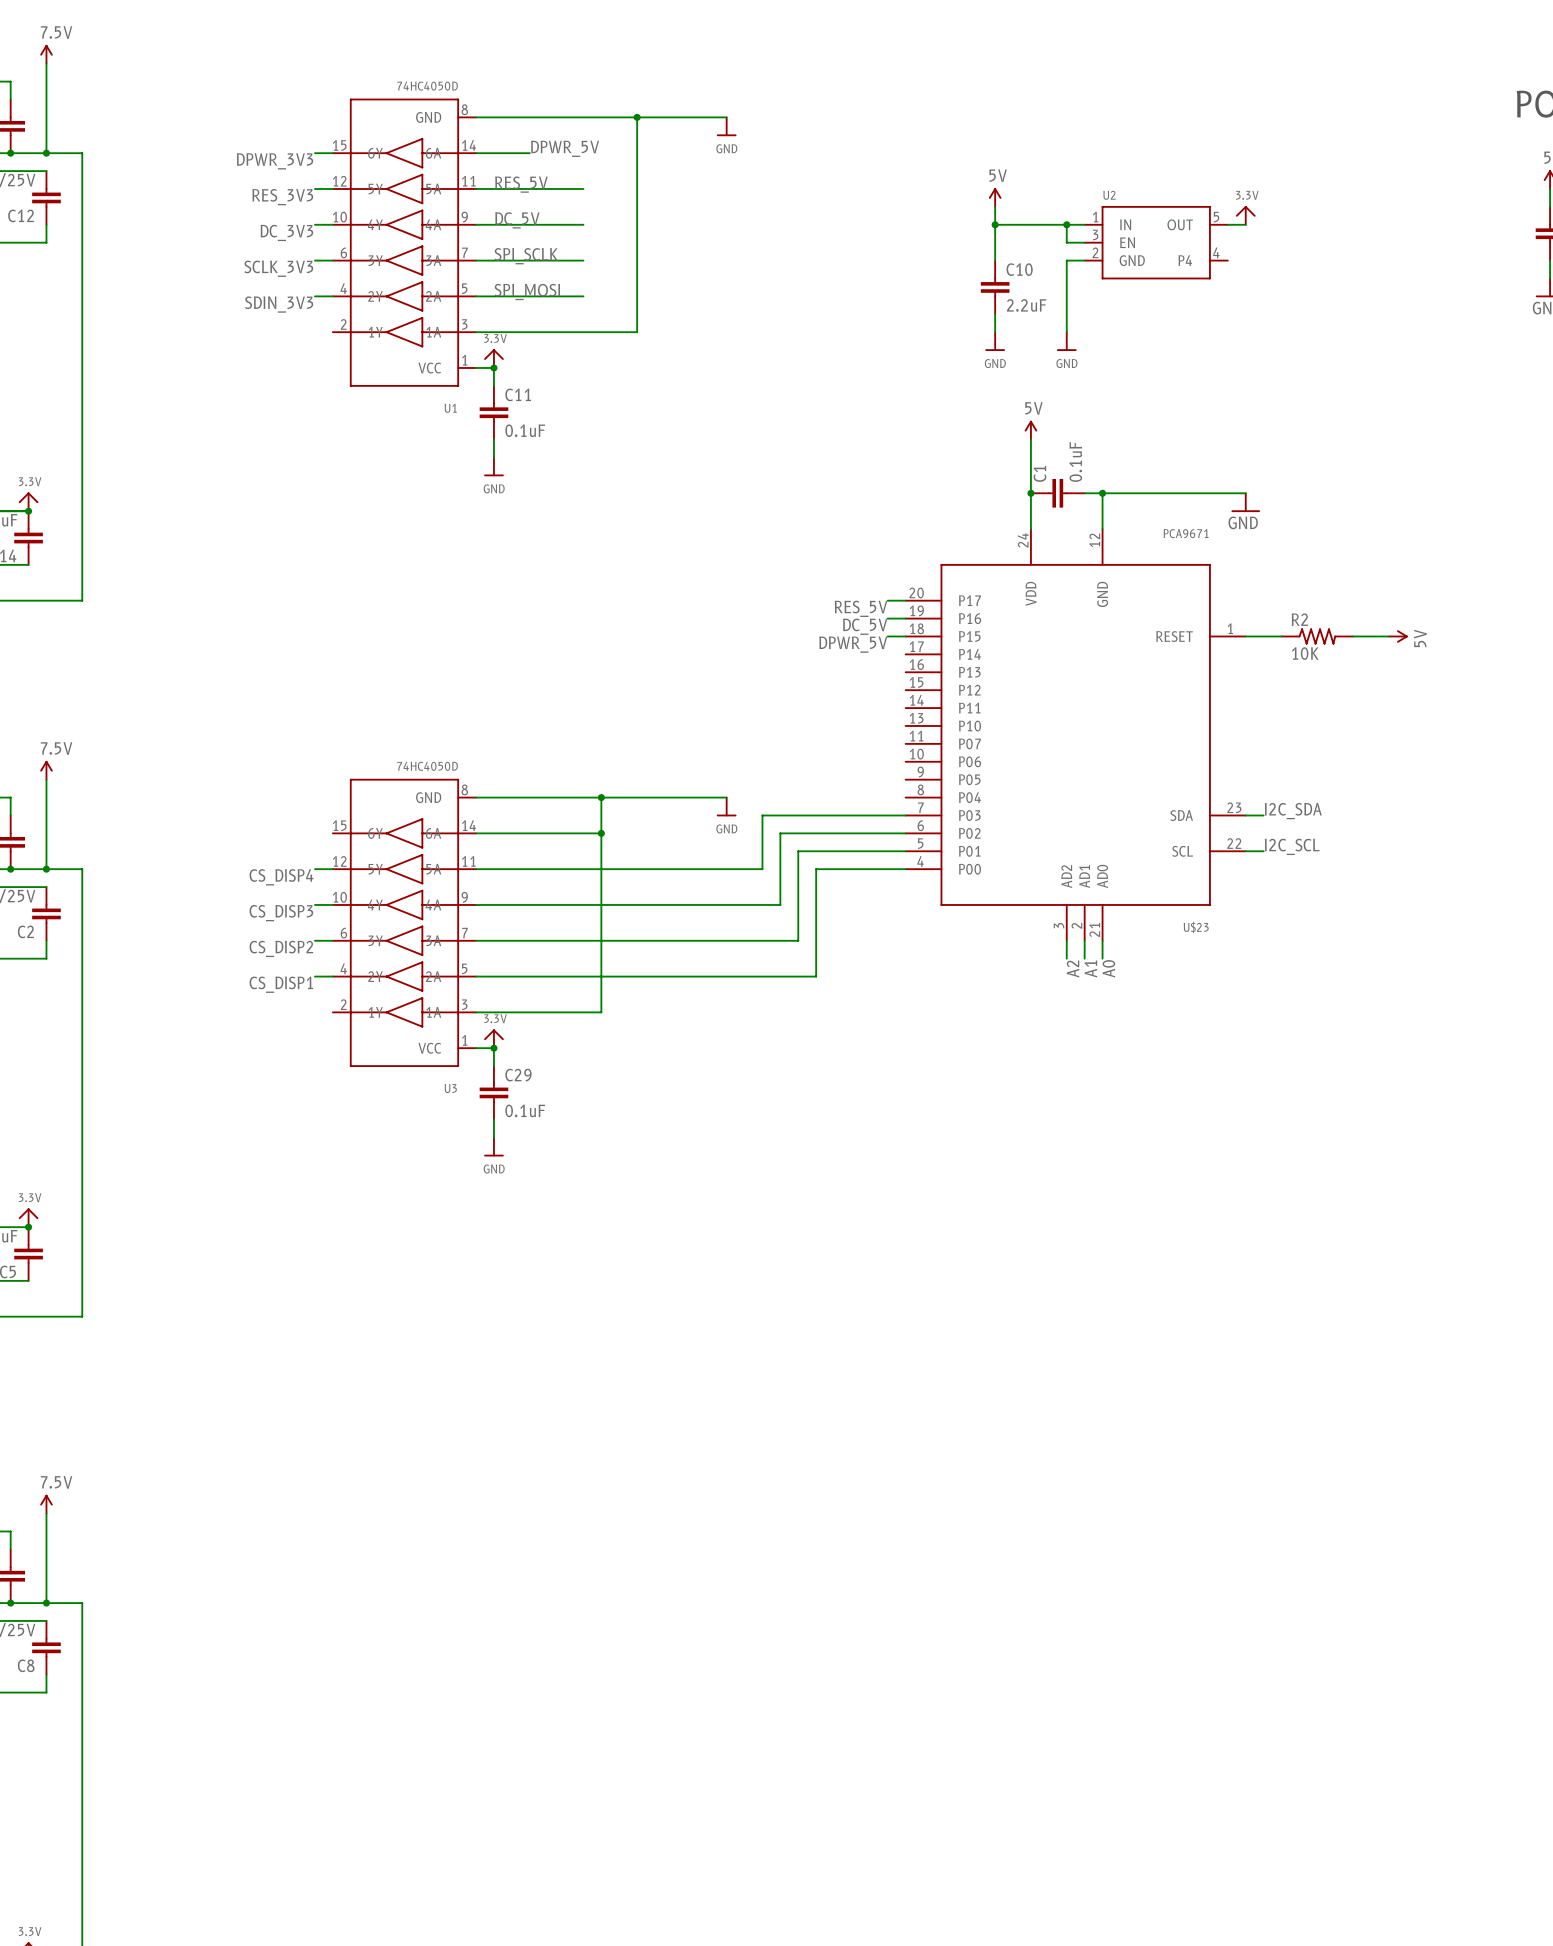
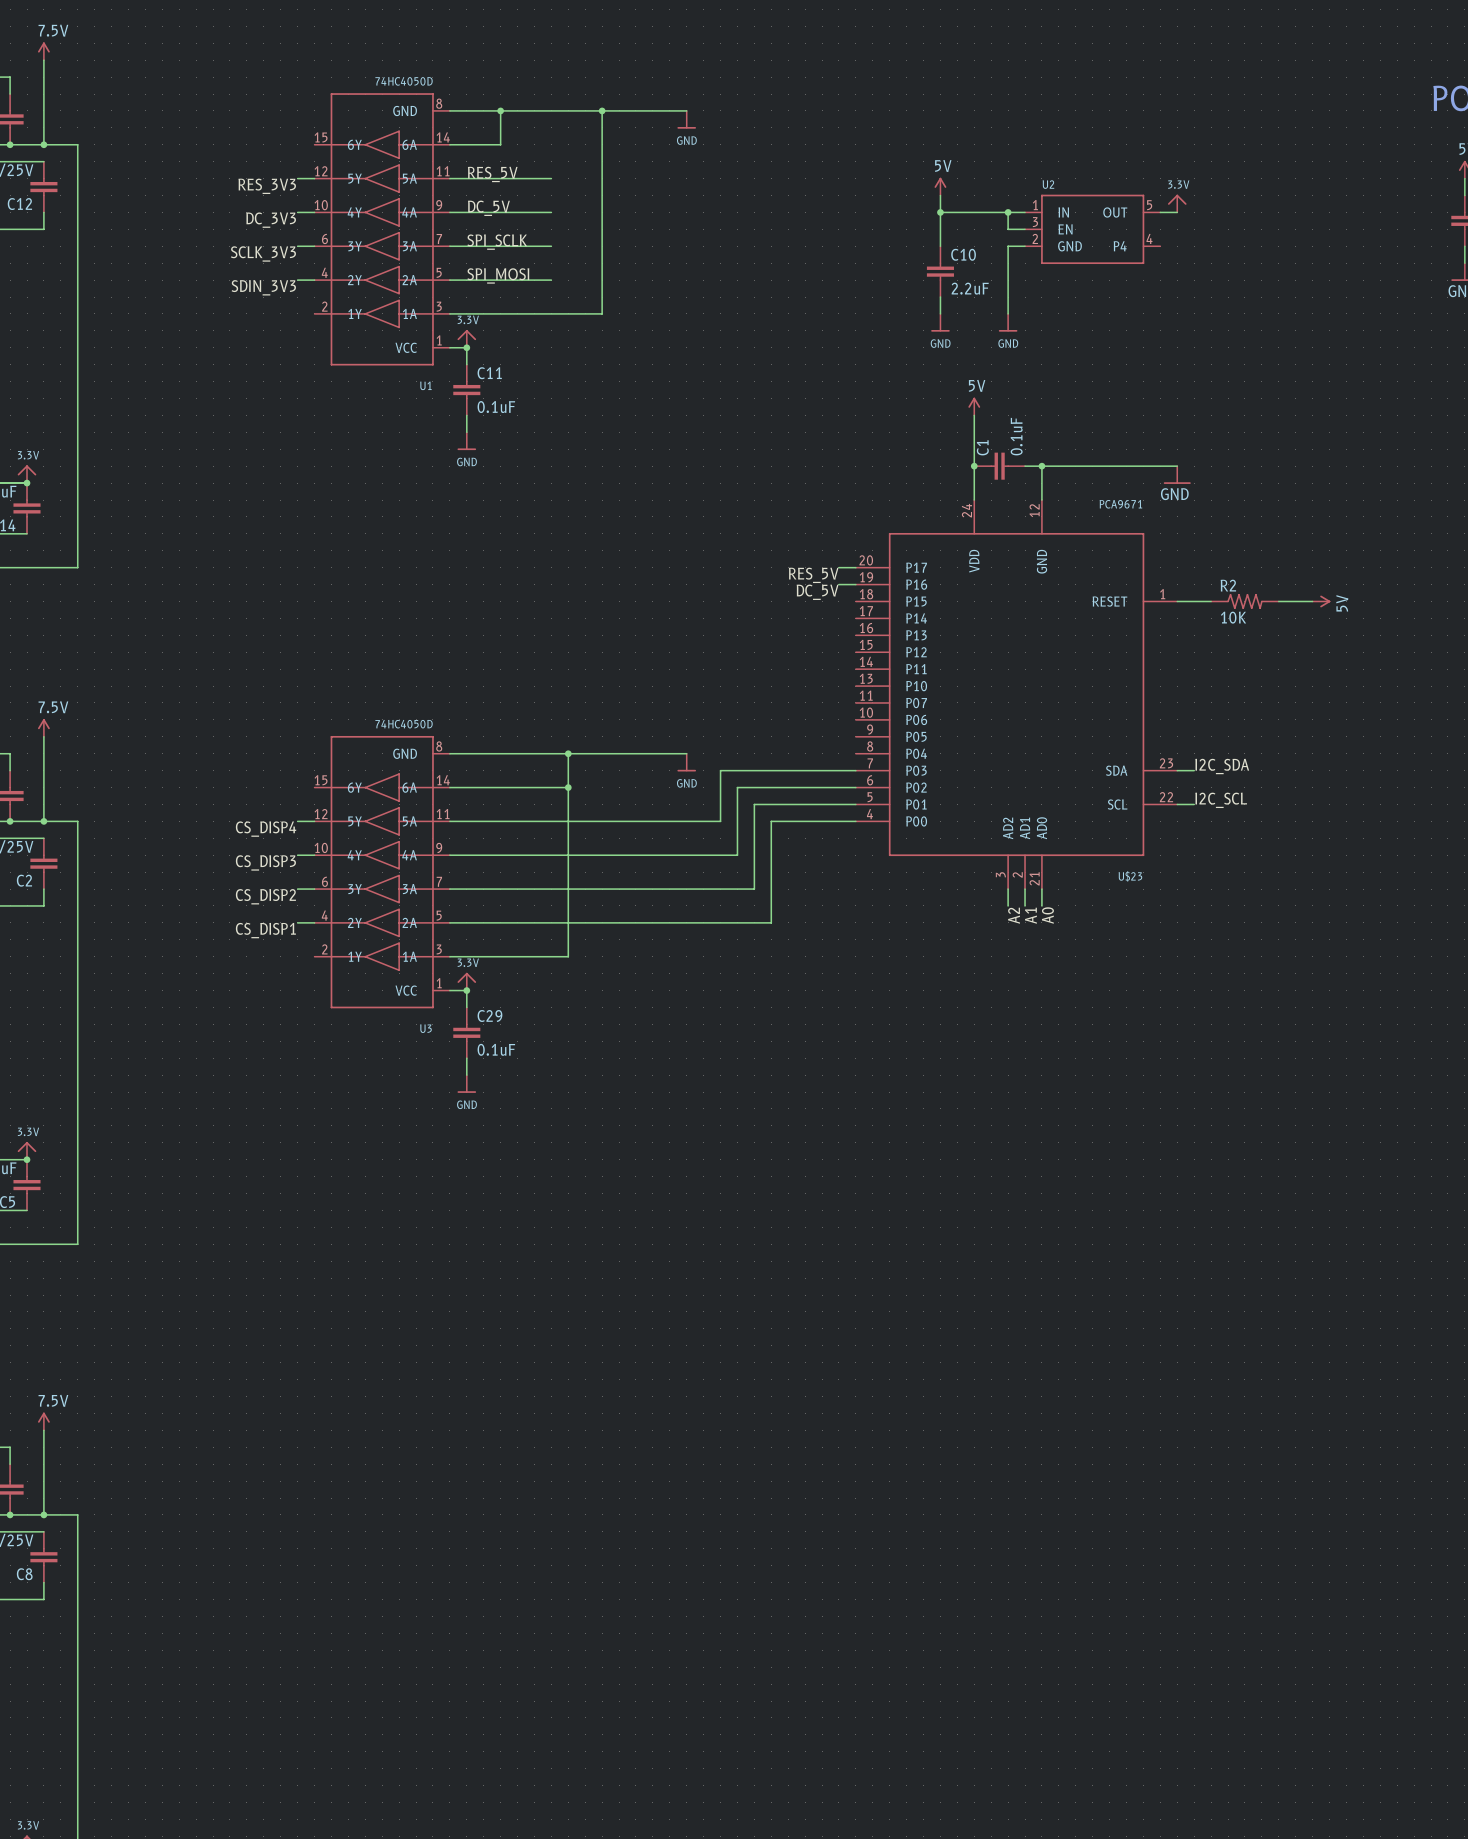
wire: none -> (500, 110) (500, 144)
junction: none -> (500, 110)
label: DPWR_5V (565, 148) -> none
wire: (314, 153) (332, 153) -> none
label: DPWR_3V3 (275, 161) -> none
wire: (887, 636) (905, 636) -> none
label: DPWR_5V (853, 644) -> none

